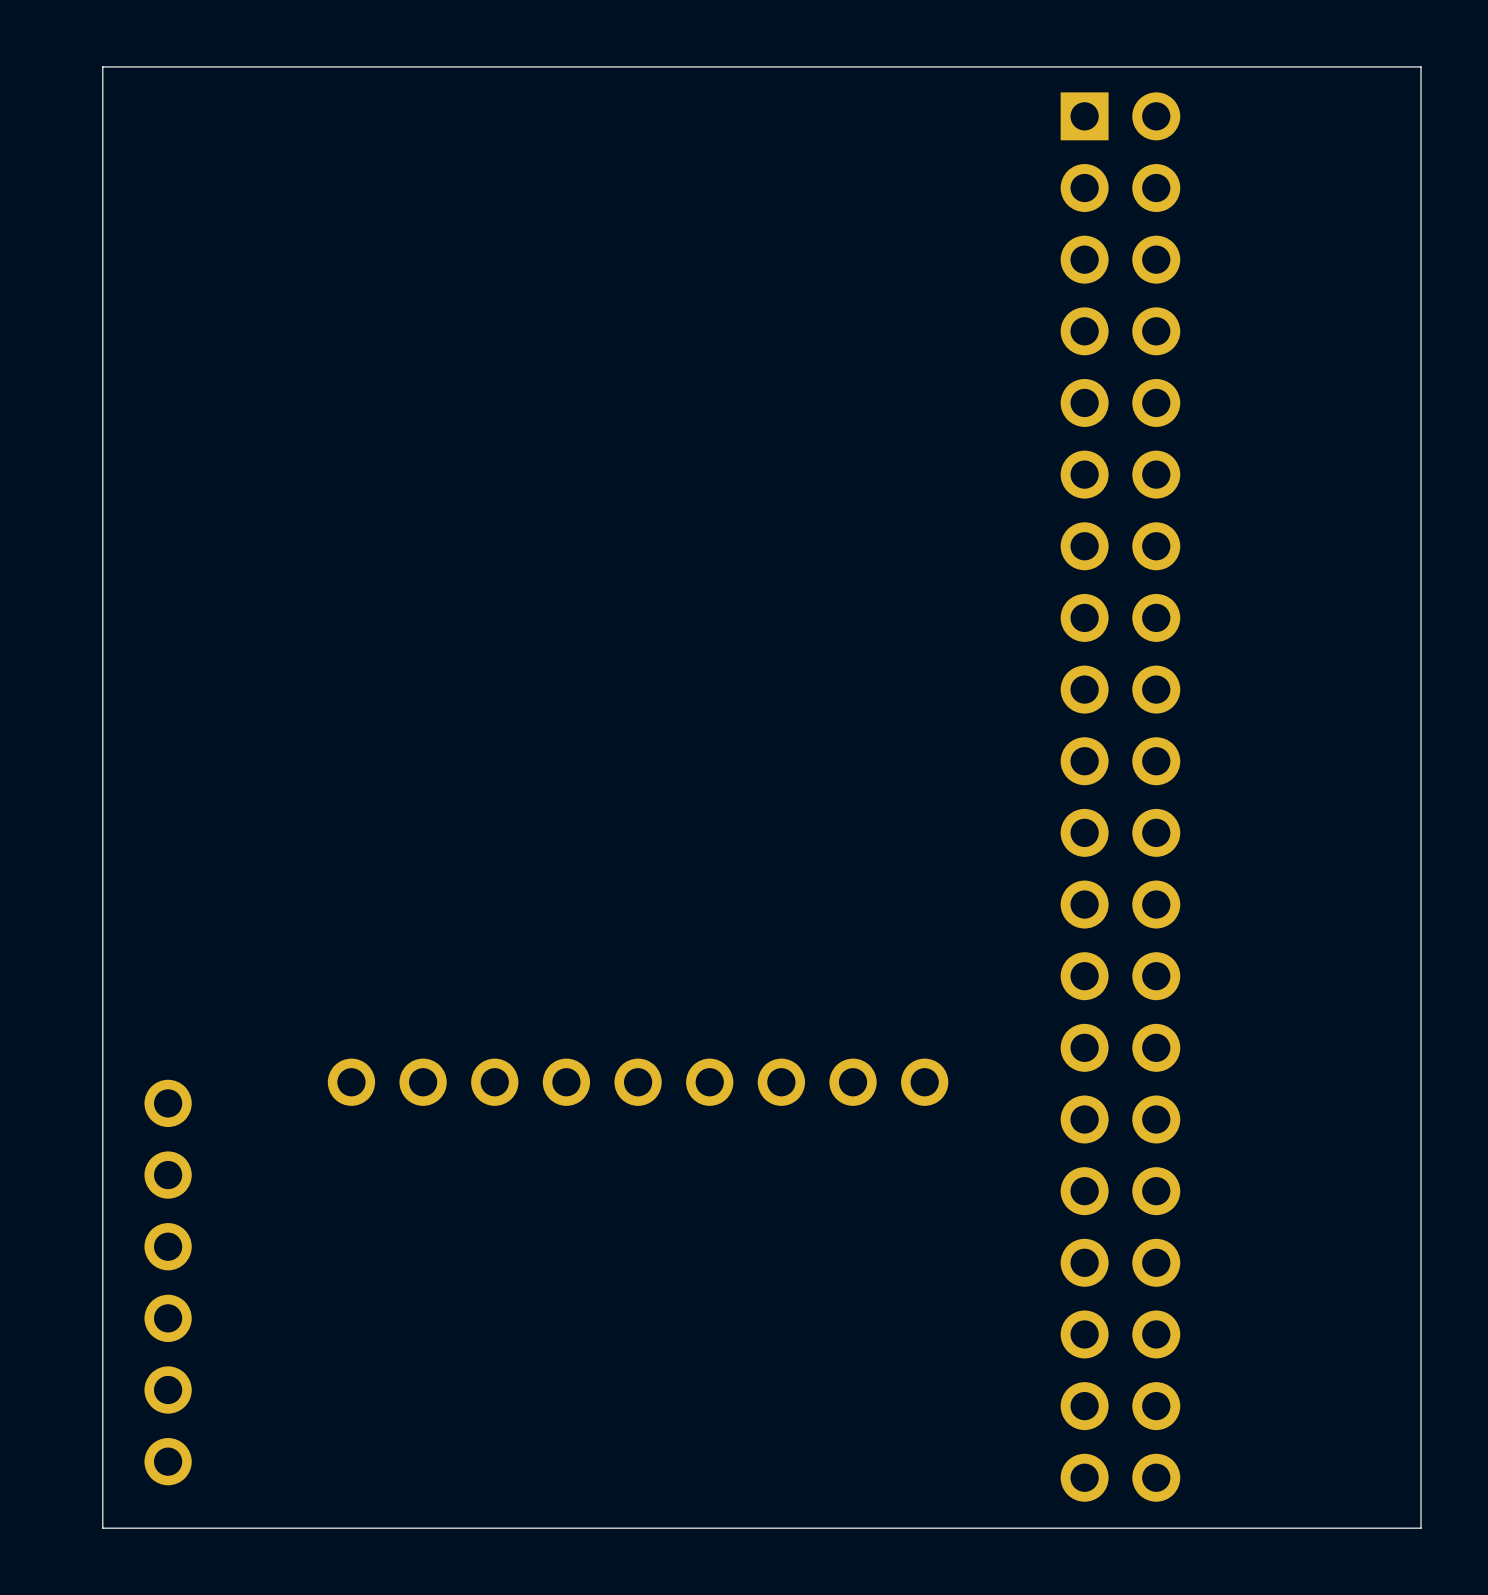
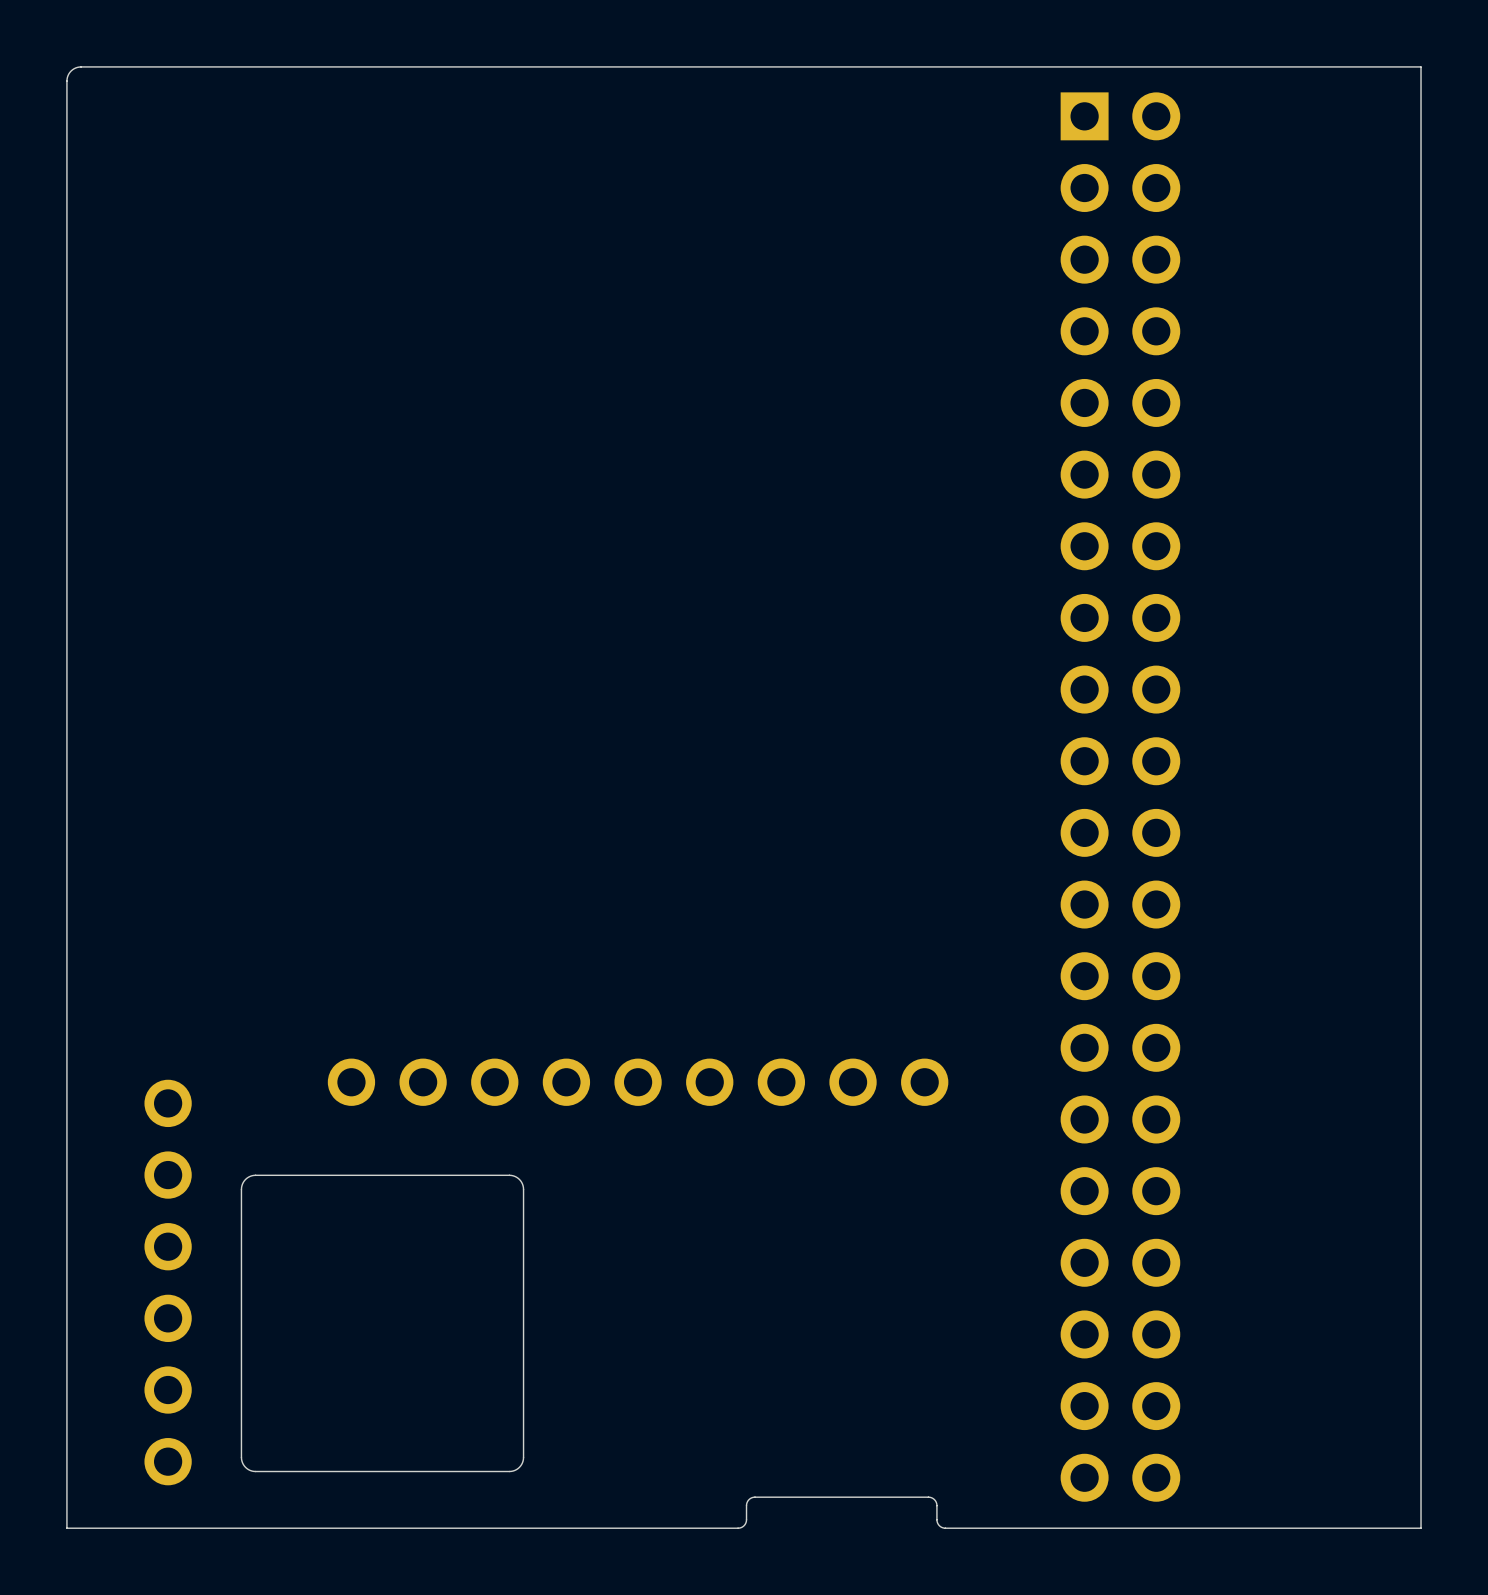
board edge: (102, 66) (102, 1528) -> (102, 66) (75, 68) (68, 73) (66, 81) (66, 1528) (102, 1528)
board edge: none -> (255, 1175) (509, 1175) (519, 1179) (523, 1189) (523, 1457) (519, 1467) (509, 1471) (255, 1471) (245, 1467) (241, 1457) (241, 1189) (245, 1179) (255, 1175)
board edge: (738, 1528) (945, 1528) -> (738, 1528) (745, 1522) (747, 1501) (754, 1497) (929, 1497) (936, 1503) (938, 1523) (945, 1528)

